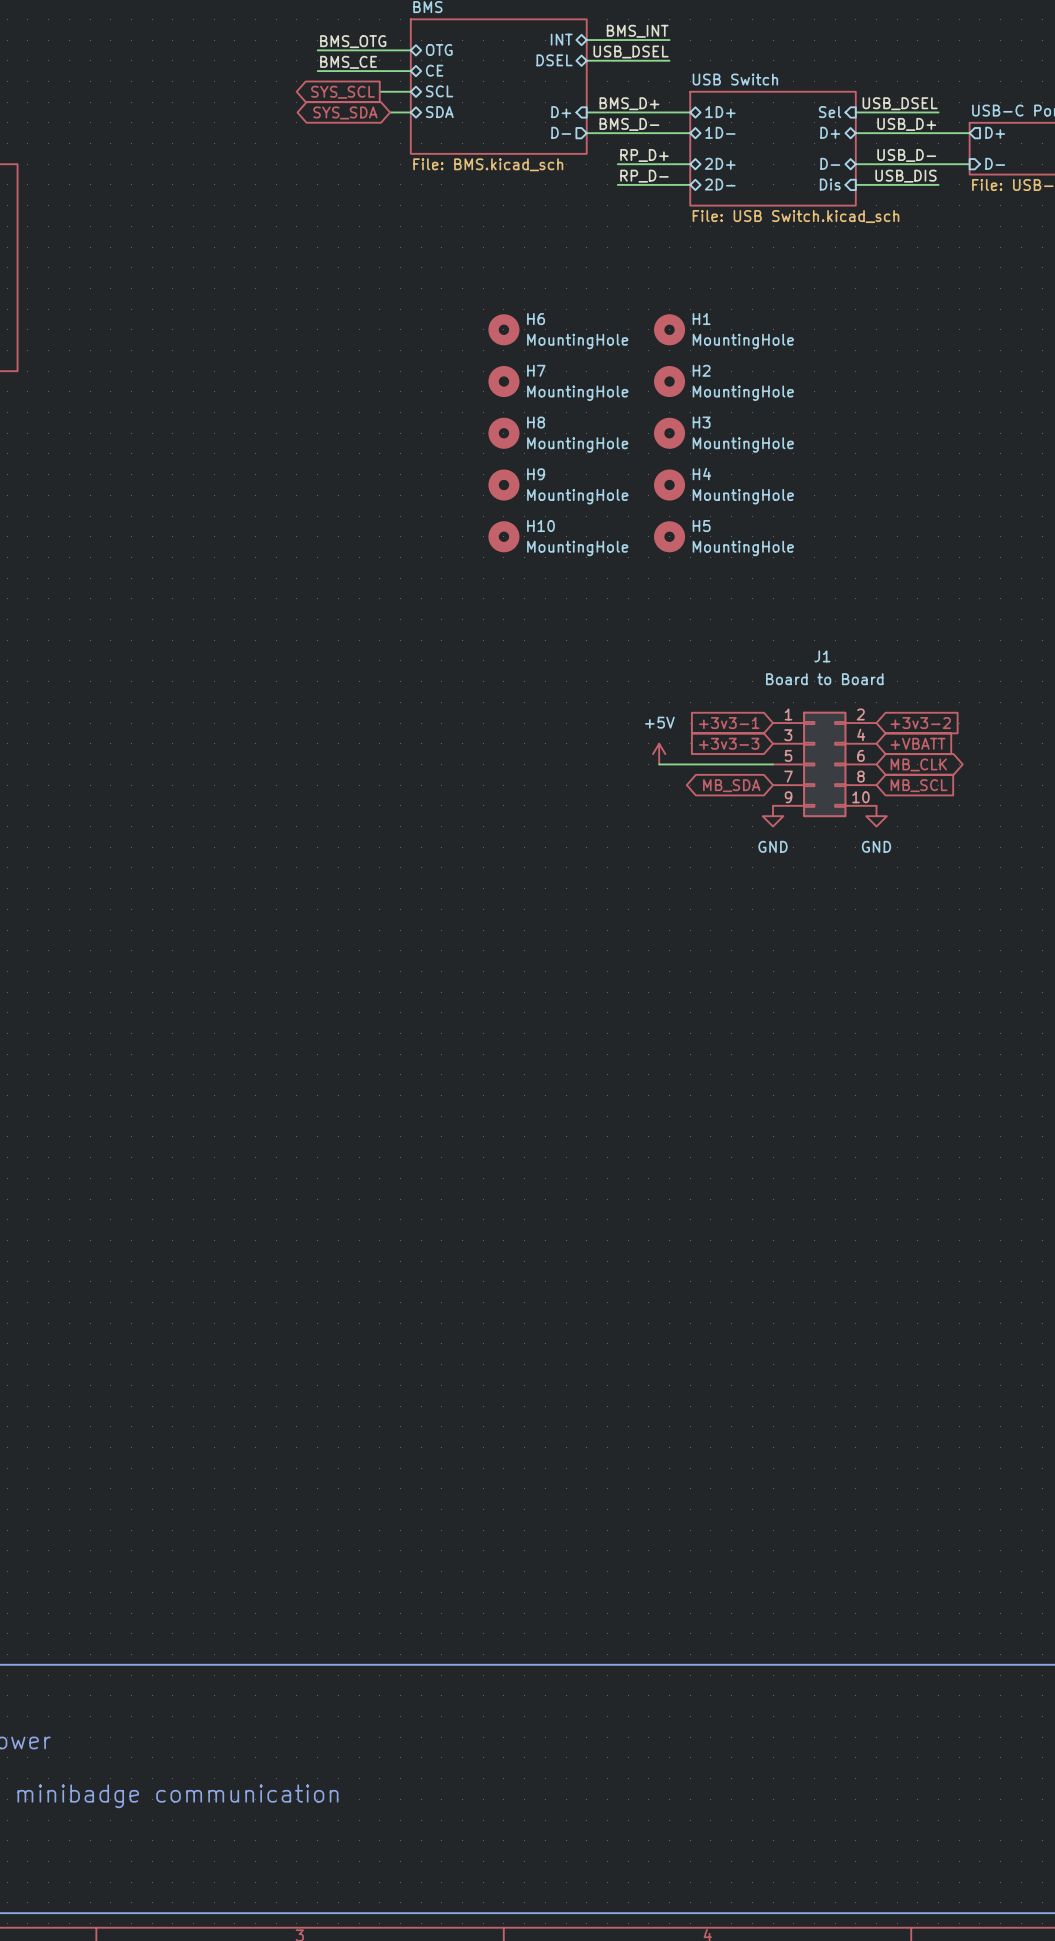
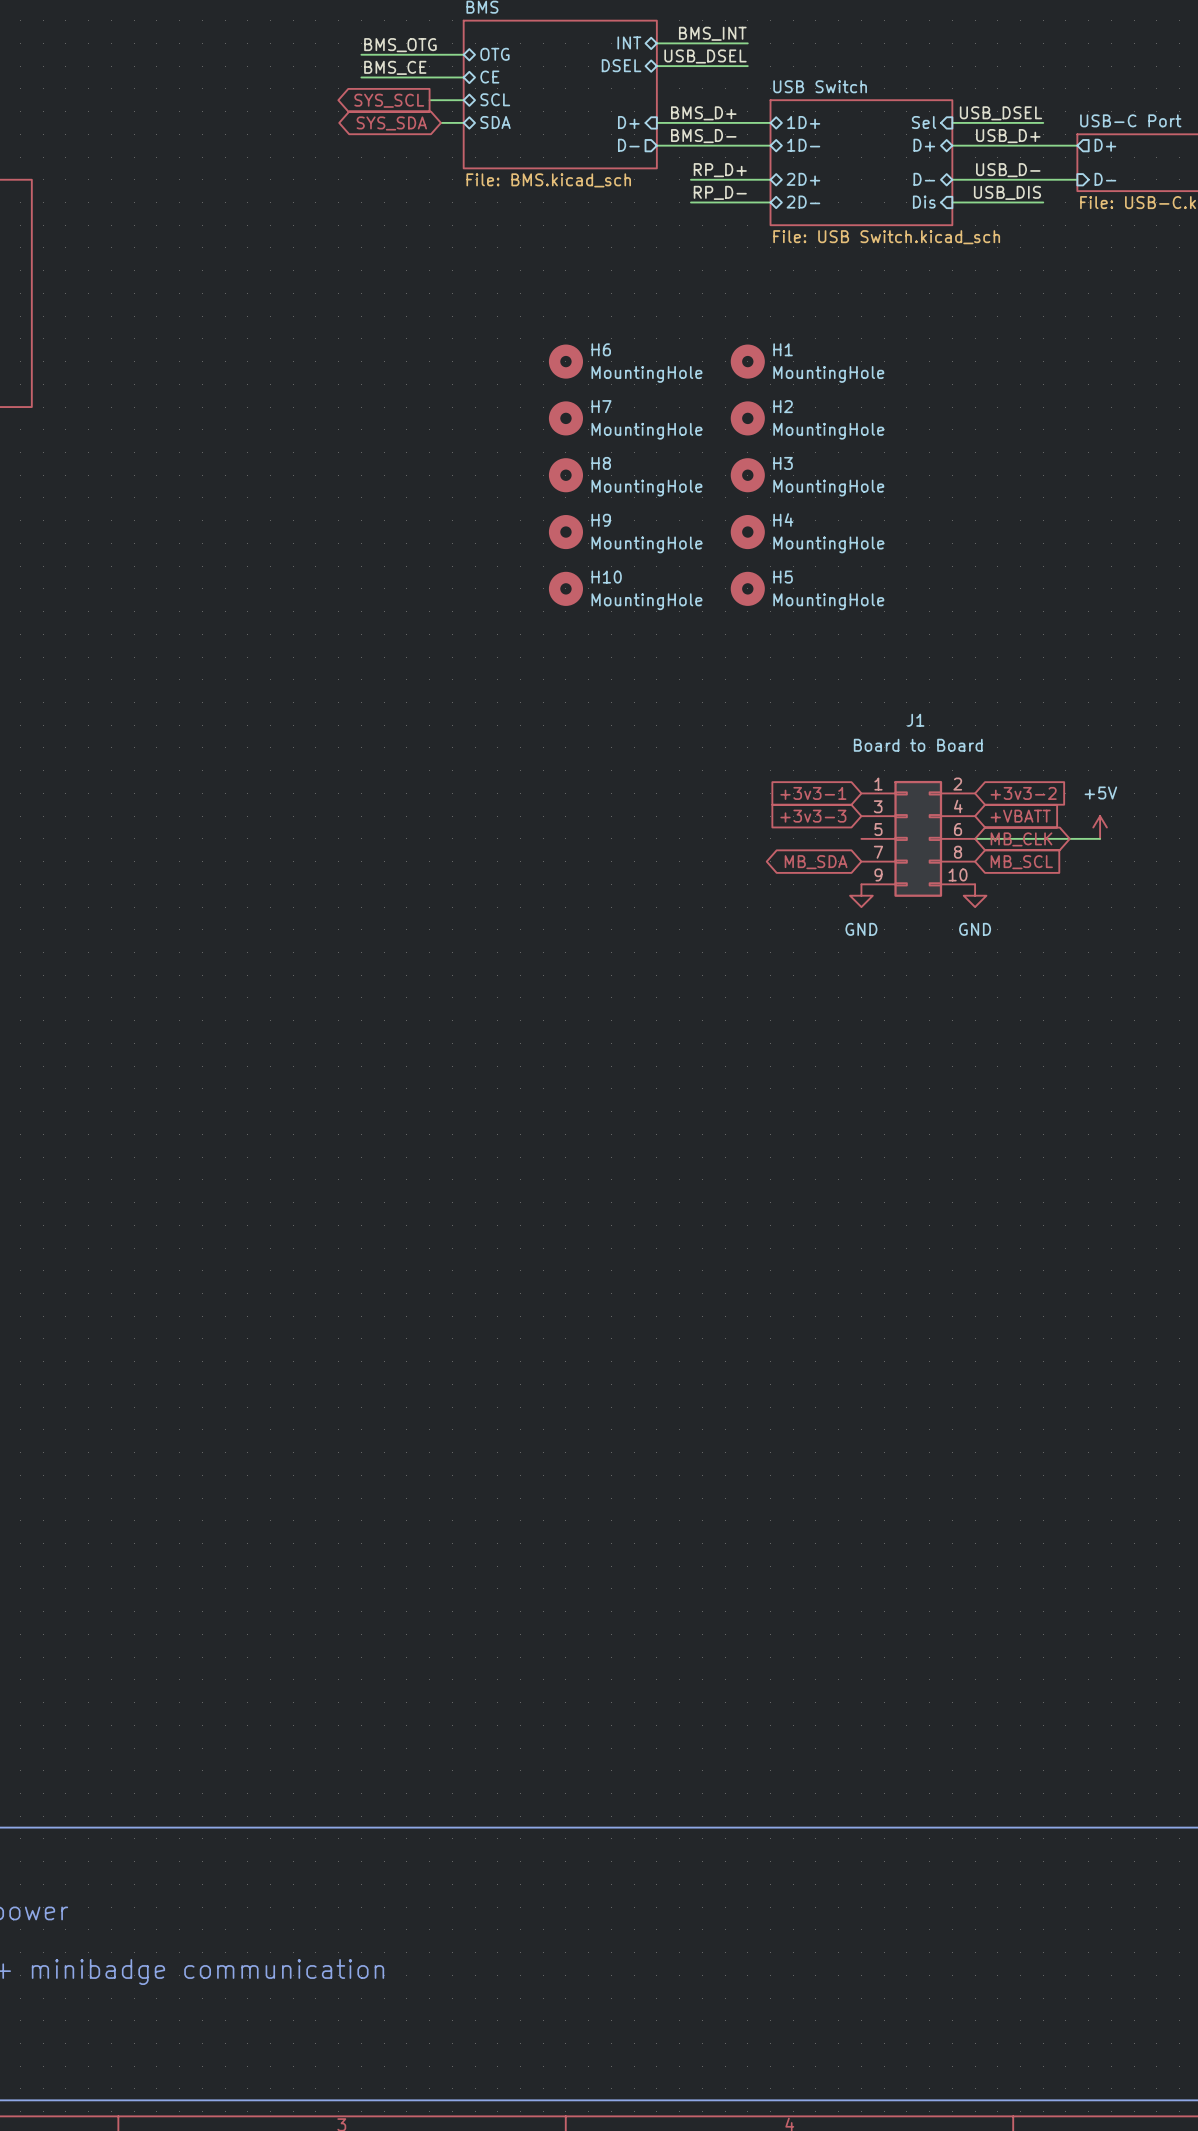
power symbol: +5V (659, 754) -> none
power symbol: none -> +5V (1100, 827)
wire: (659, 764) (773, 764) -> none
wire: none -> (975, 838) (1100, 838)

